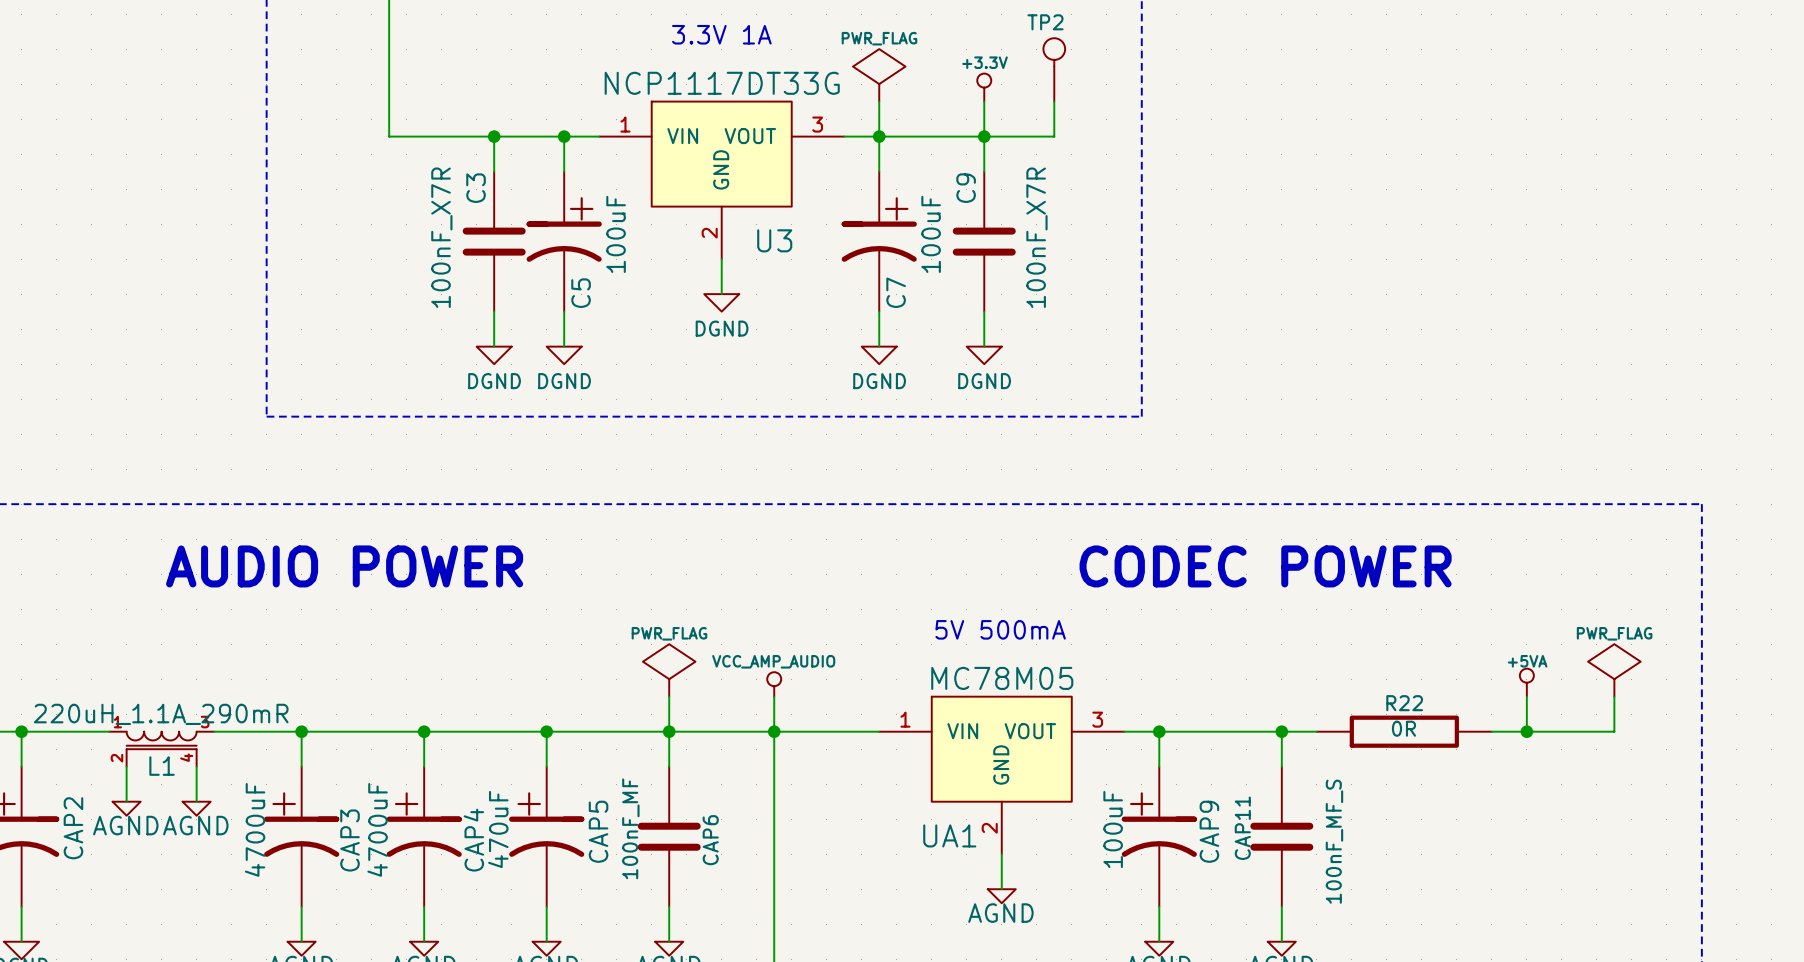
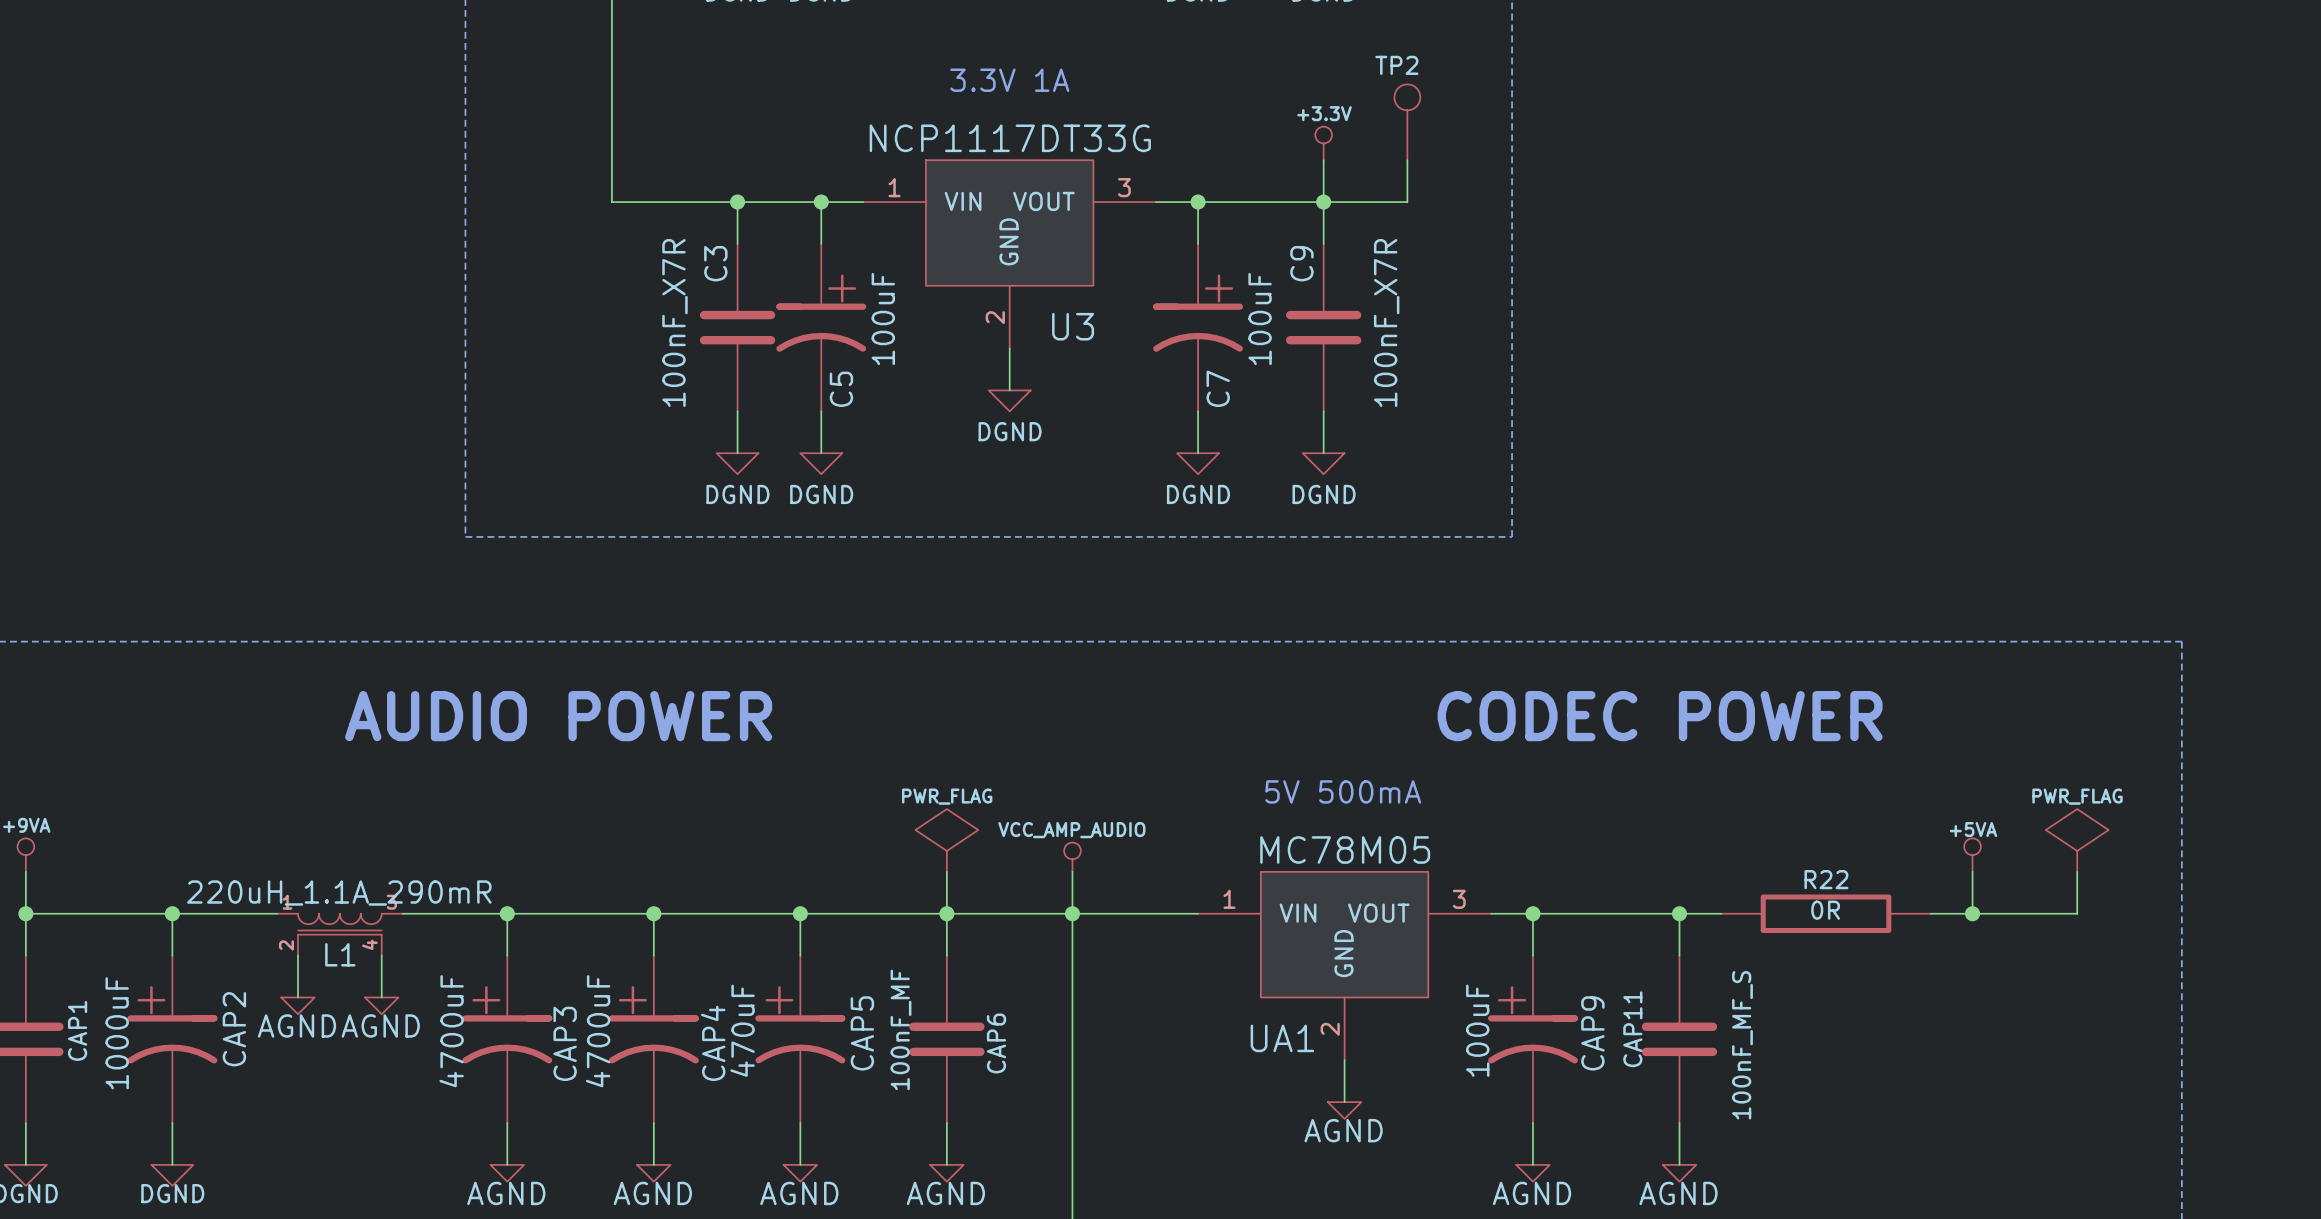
power symbol: PWR_FLAG (879, 75) -> none
wire: (879, 101) (879, 136) -> none

